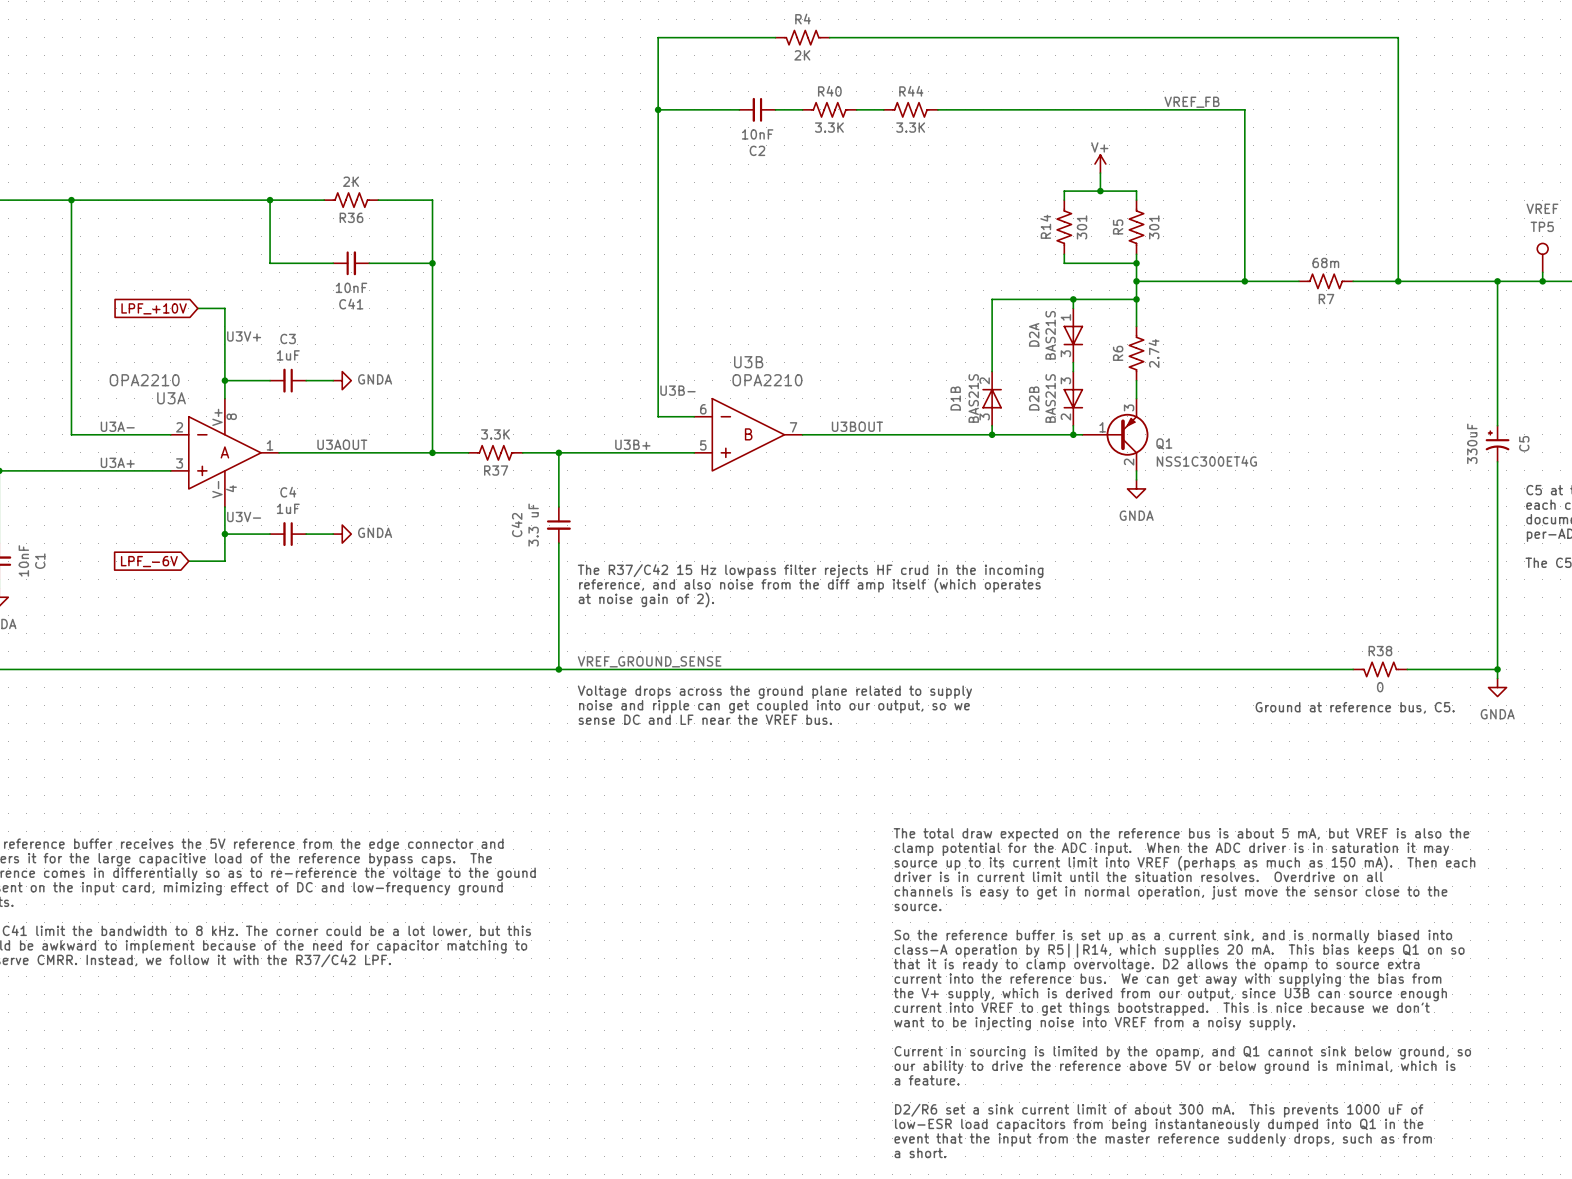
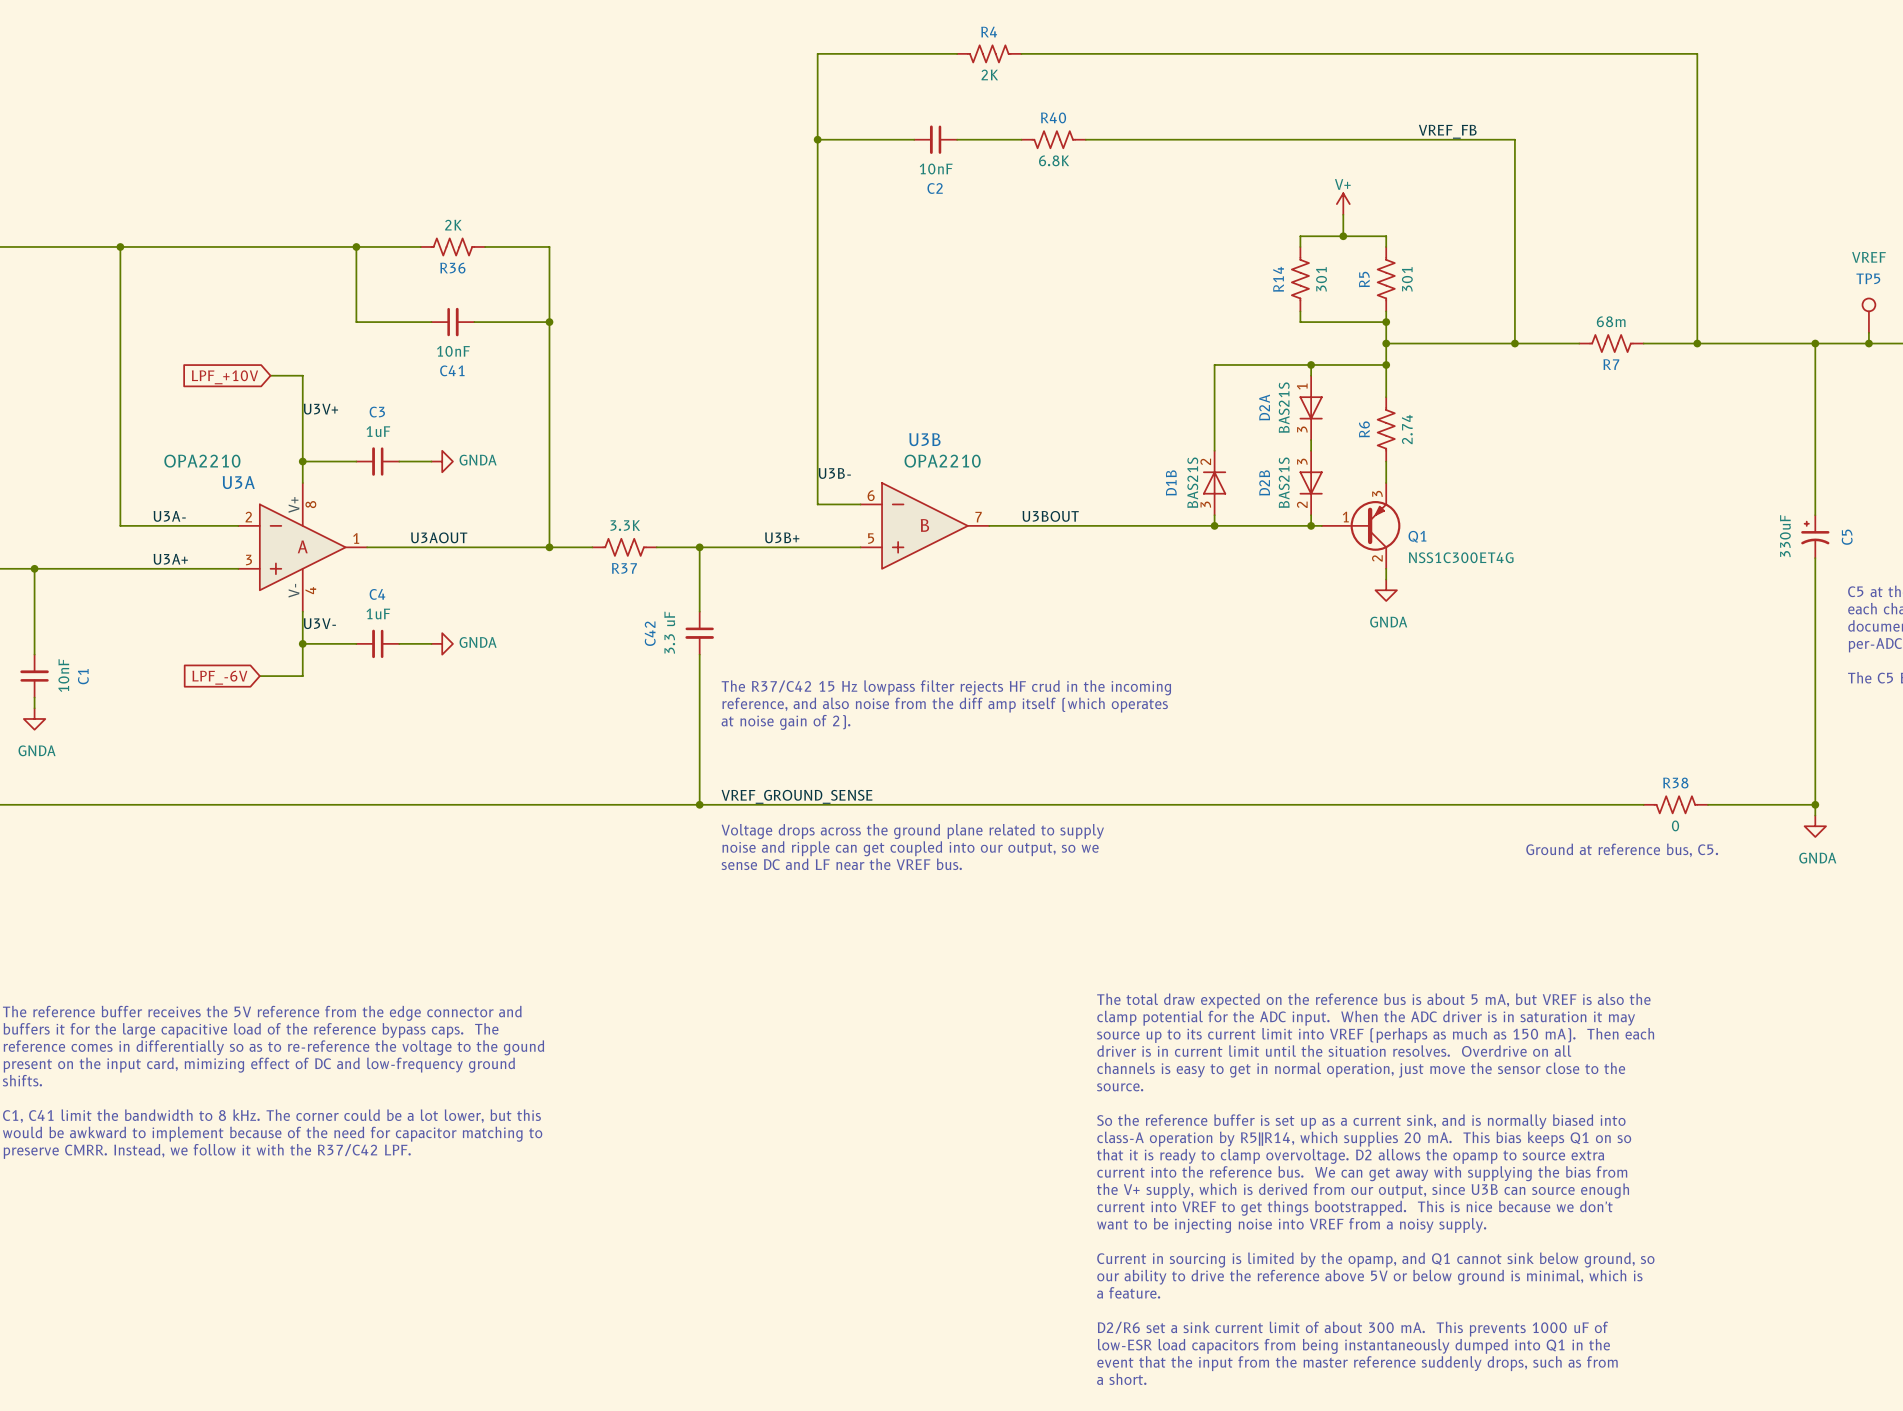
R40 flip: as is (829, 109) -> left-right (1053, 139)
R44: 3.3K (910, 109) -> none
R40 value: 3.3K (829, 127) -> 6.8K (1054, 160)

